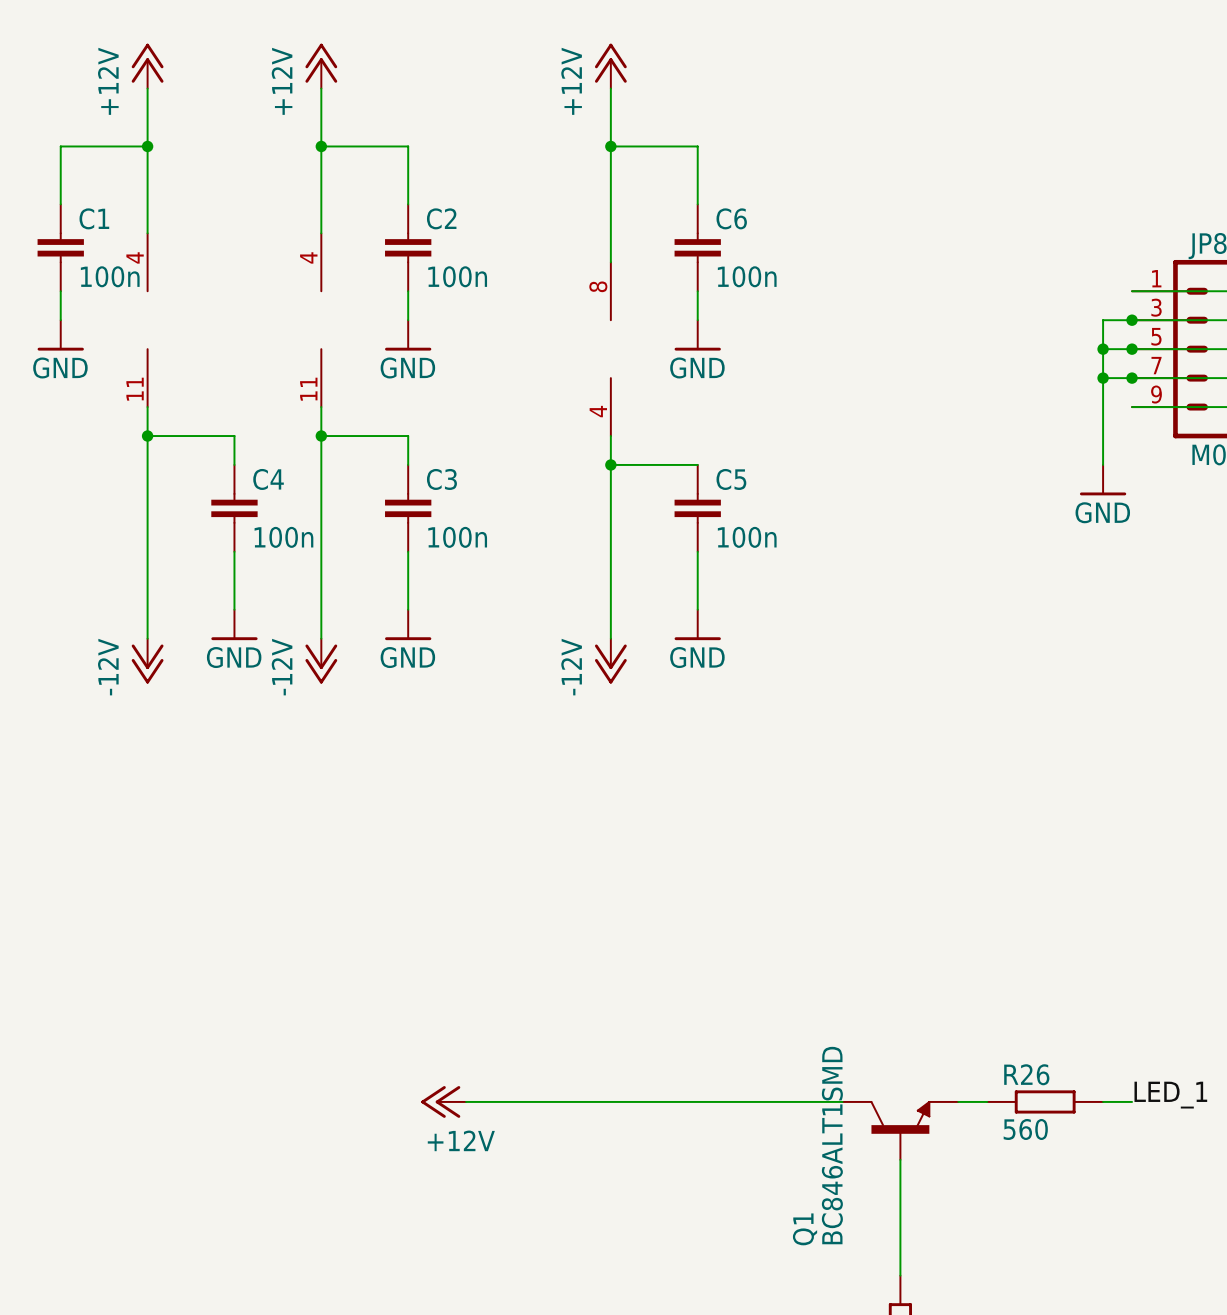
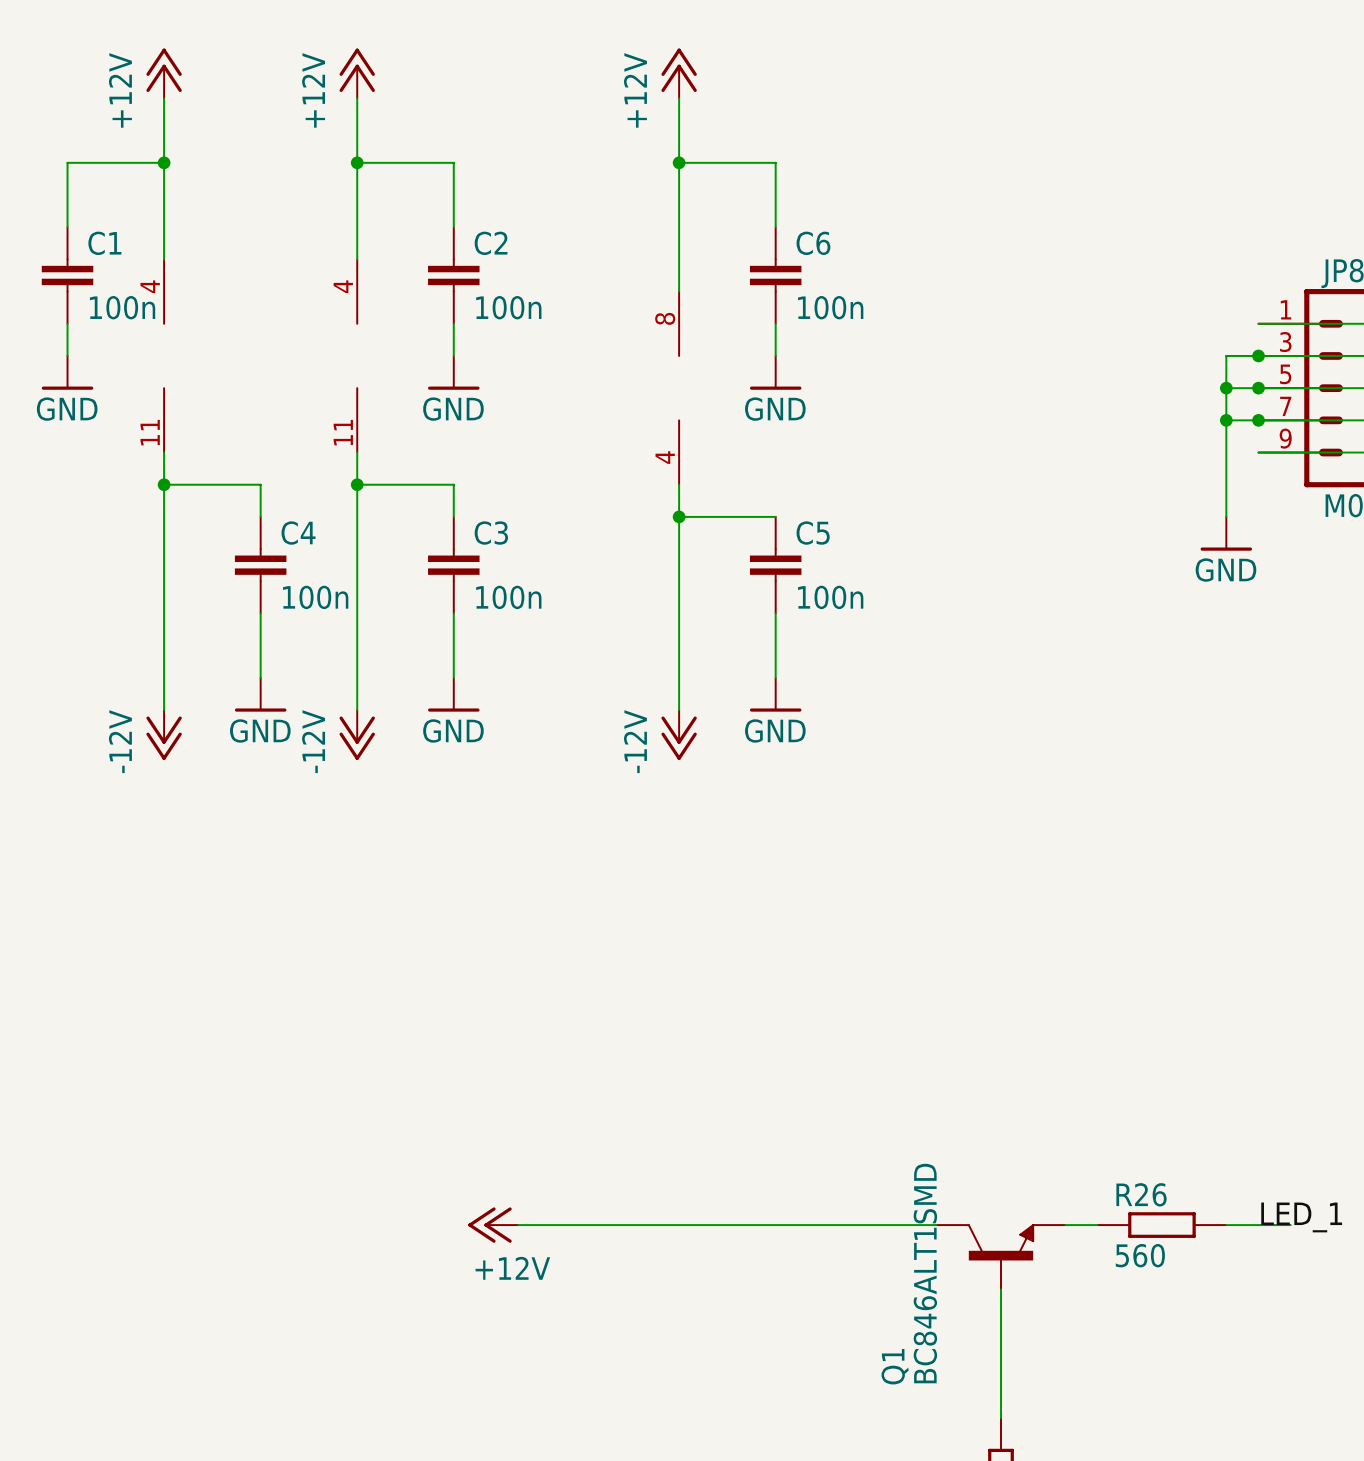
wire: none -> (1258, 1225) (1290, 1225)

